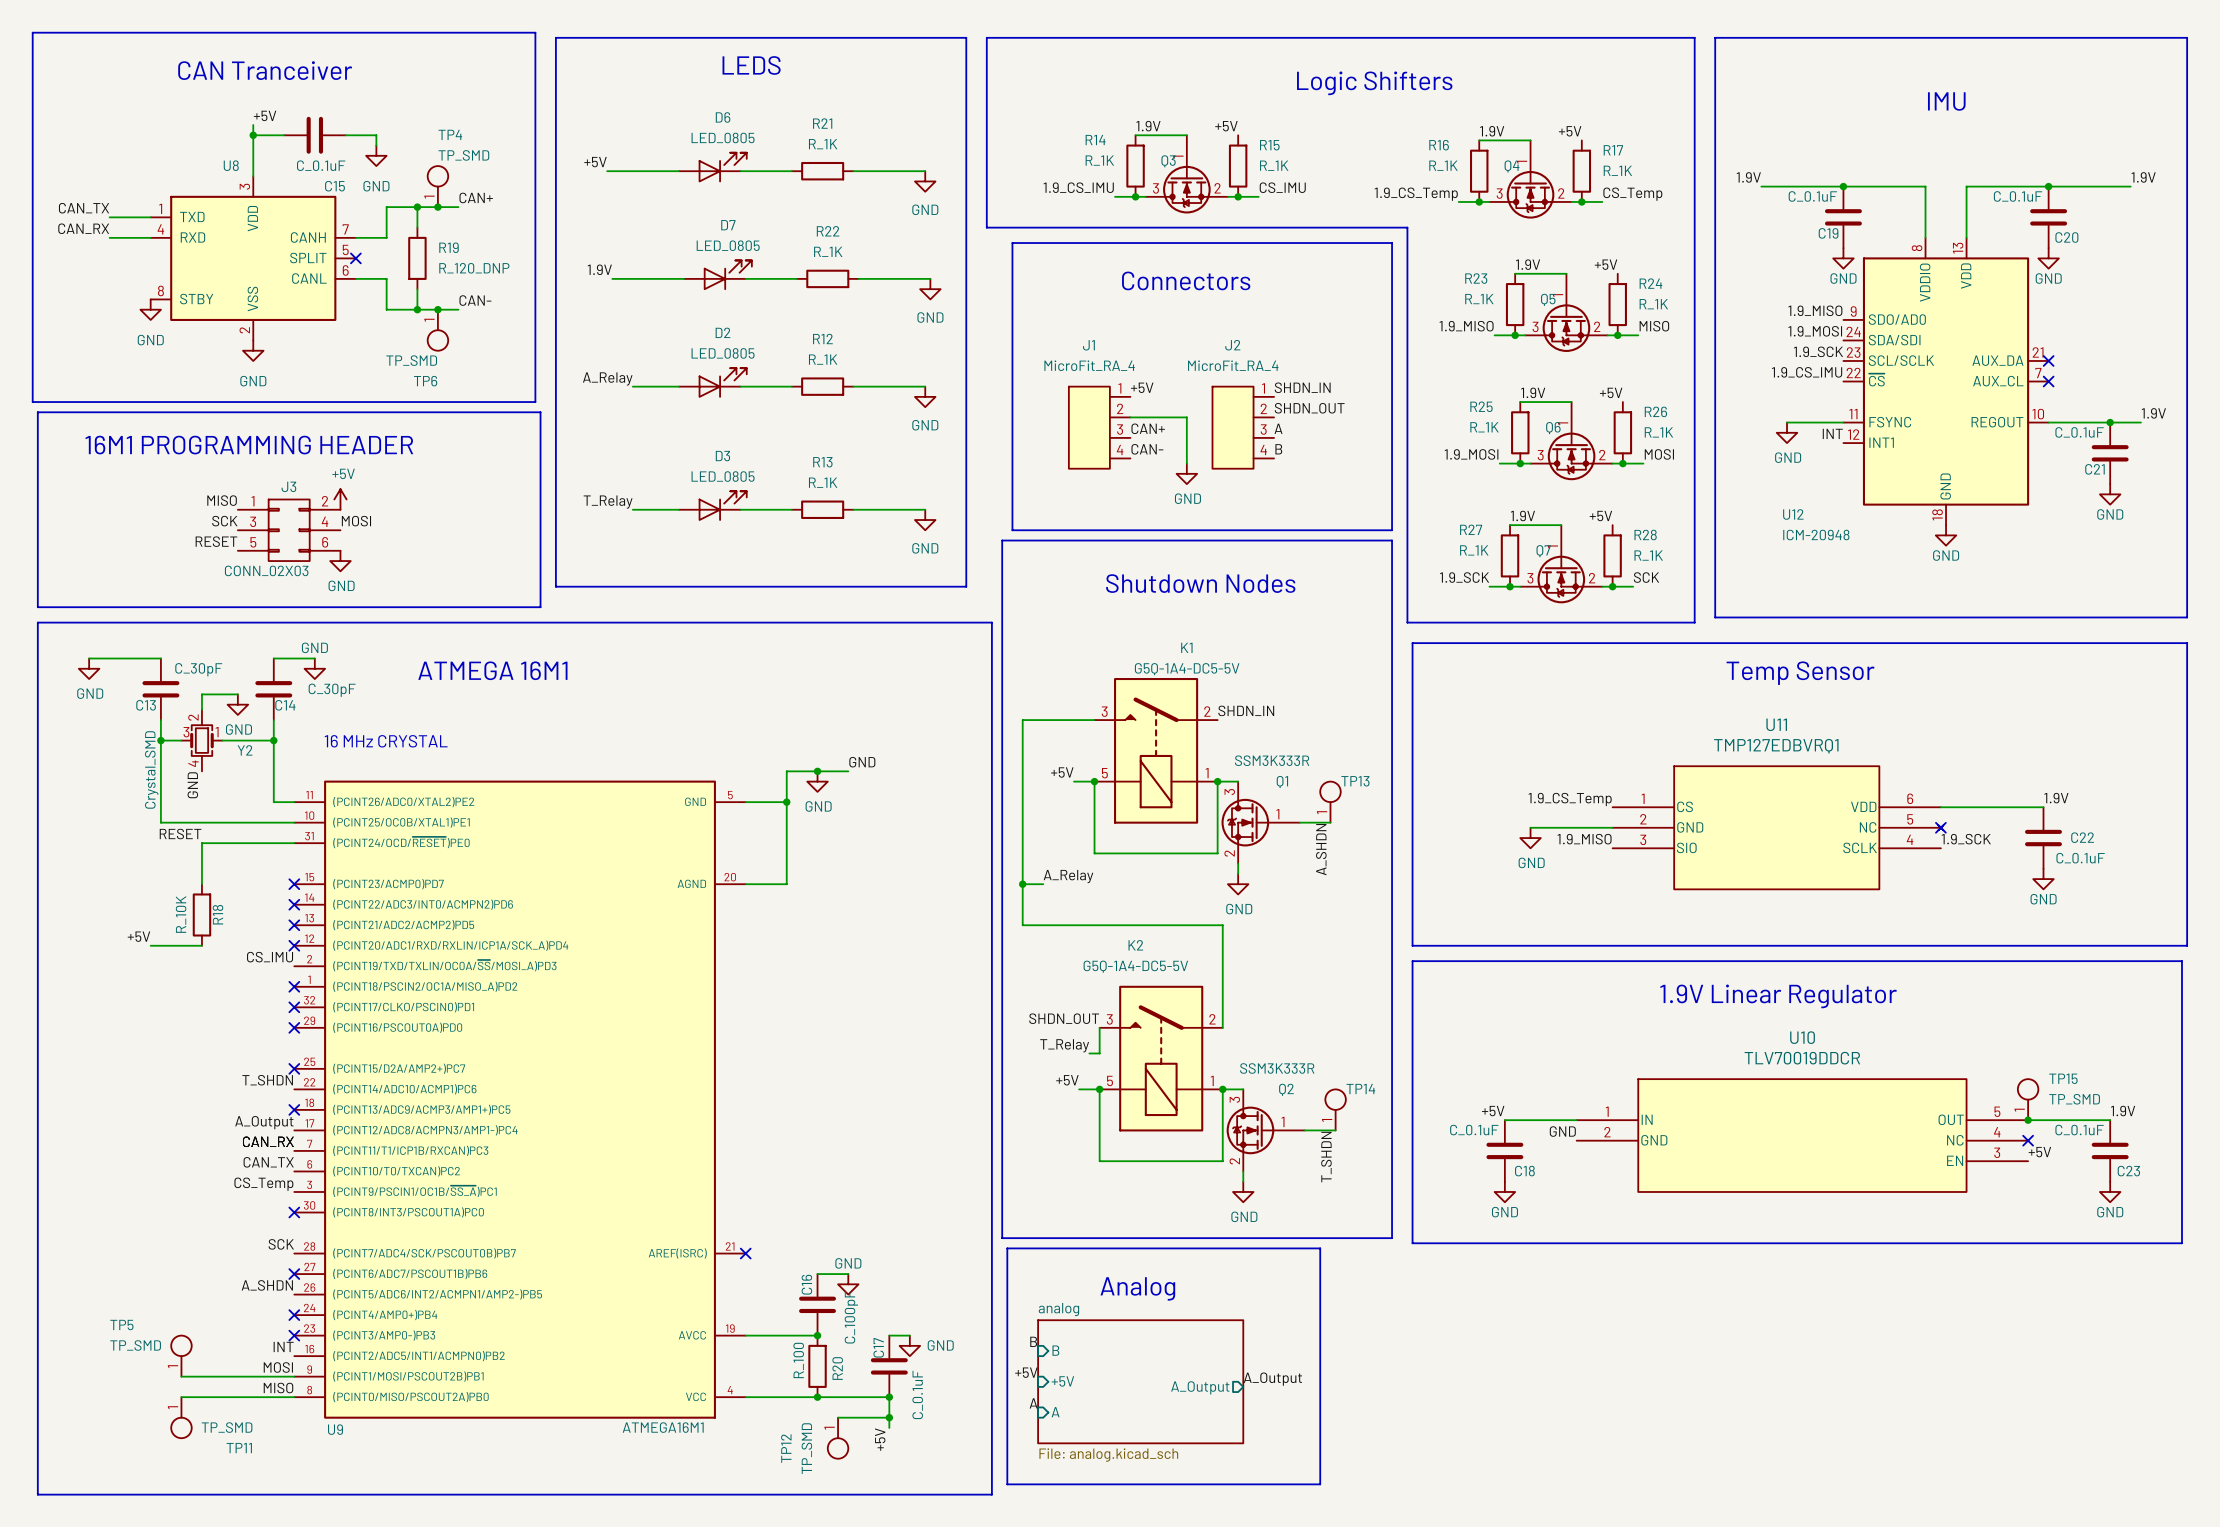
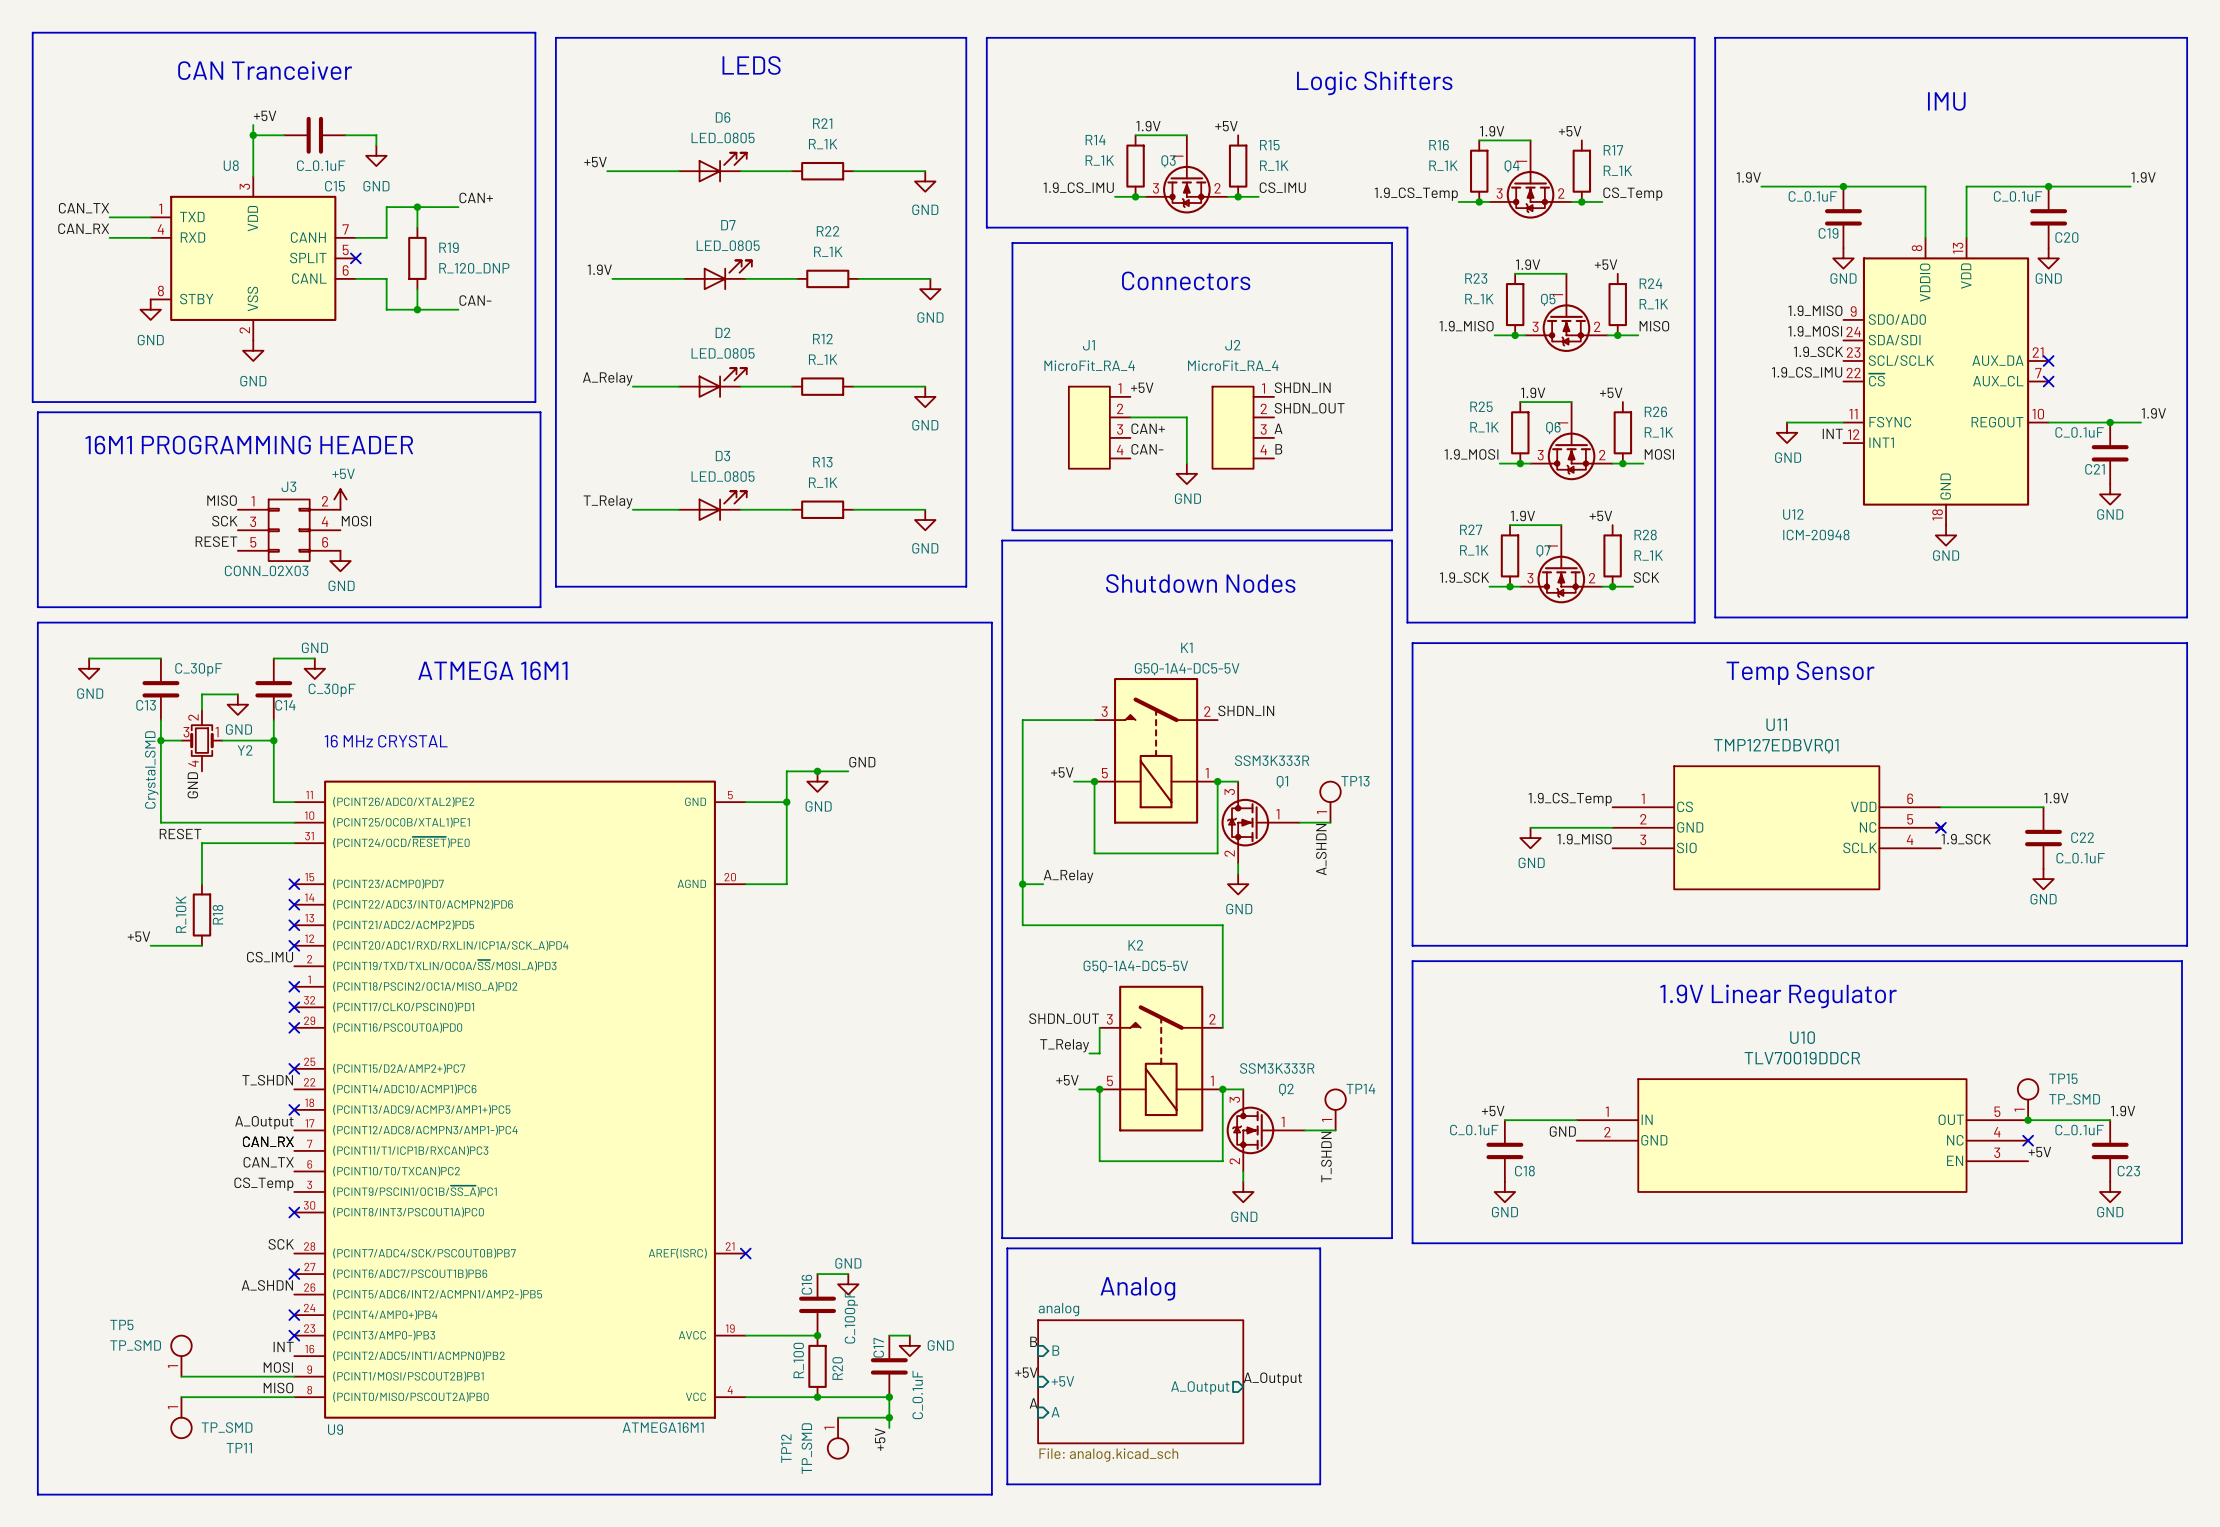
TP4: TP_SMD (437, 186) -> none
junction: (437, 207) -> none
junction: (437, 309) -> none
TP6: TP_SMD (437, 330) -> none

